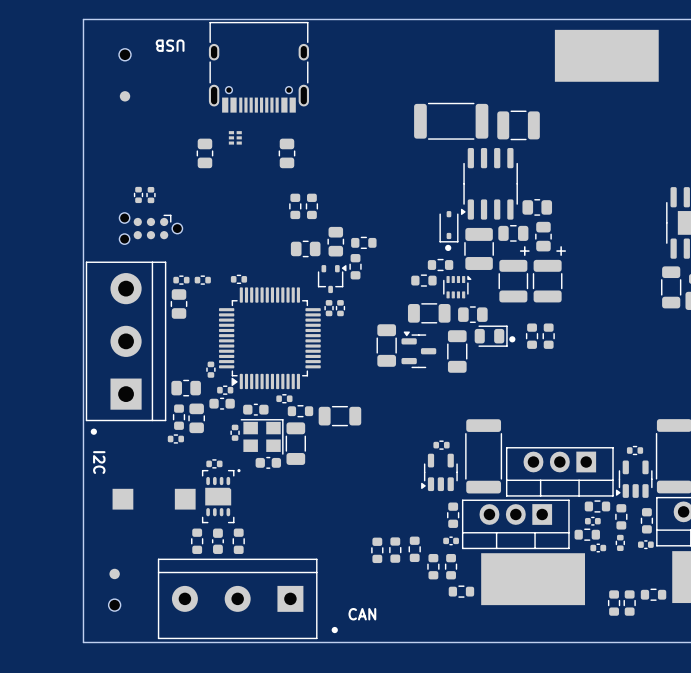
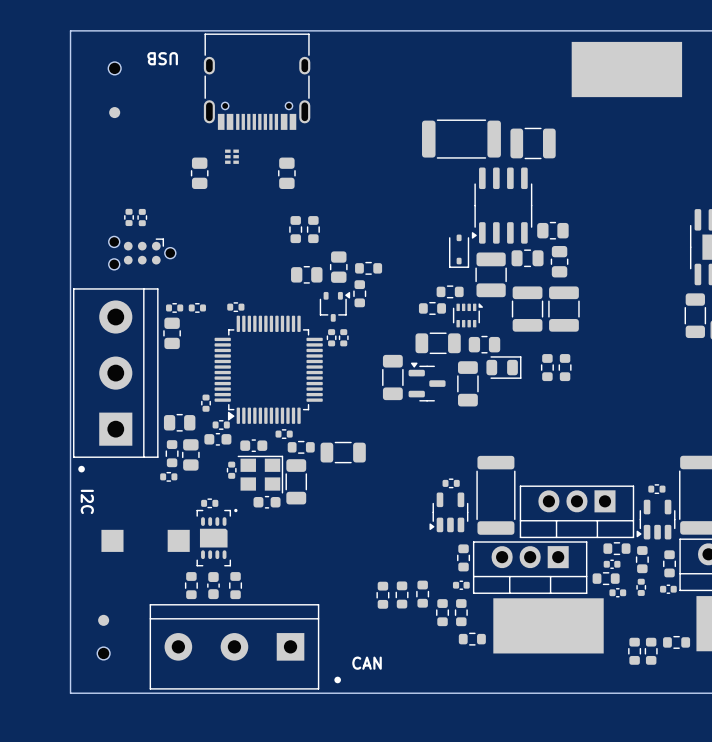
drawing: [445, 244, 452, 252] -> none
line: (524, 246) (524, 255) -> none
line: (561, 246) (561, 255) -> none
line: (520, 251) (528, 251) -> none
line: (556, 251) (565, 251) -> none
drawing: [509, 336, 516, 343] -> none

